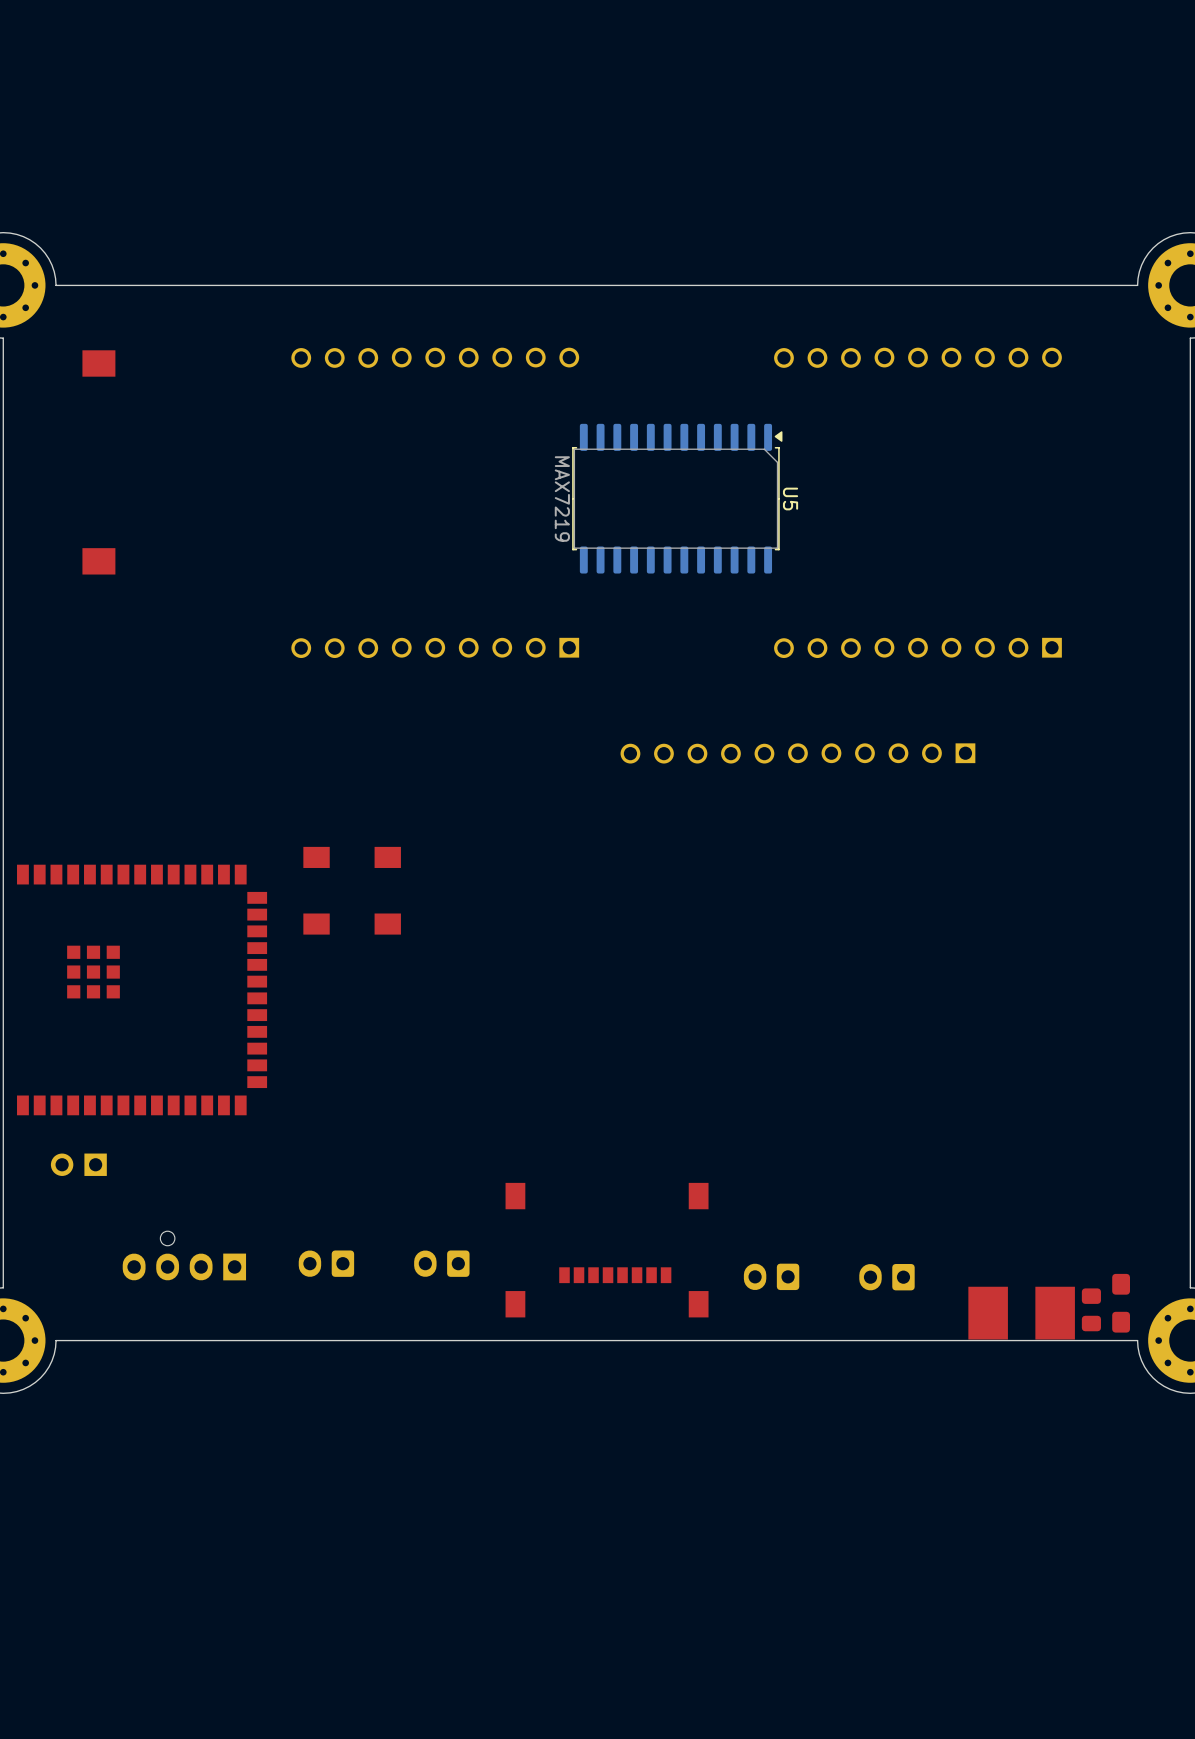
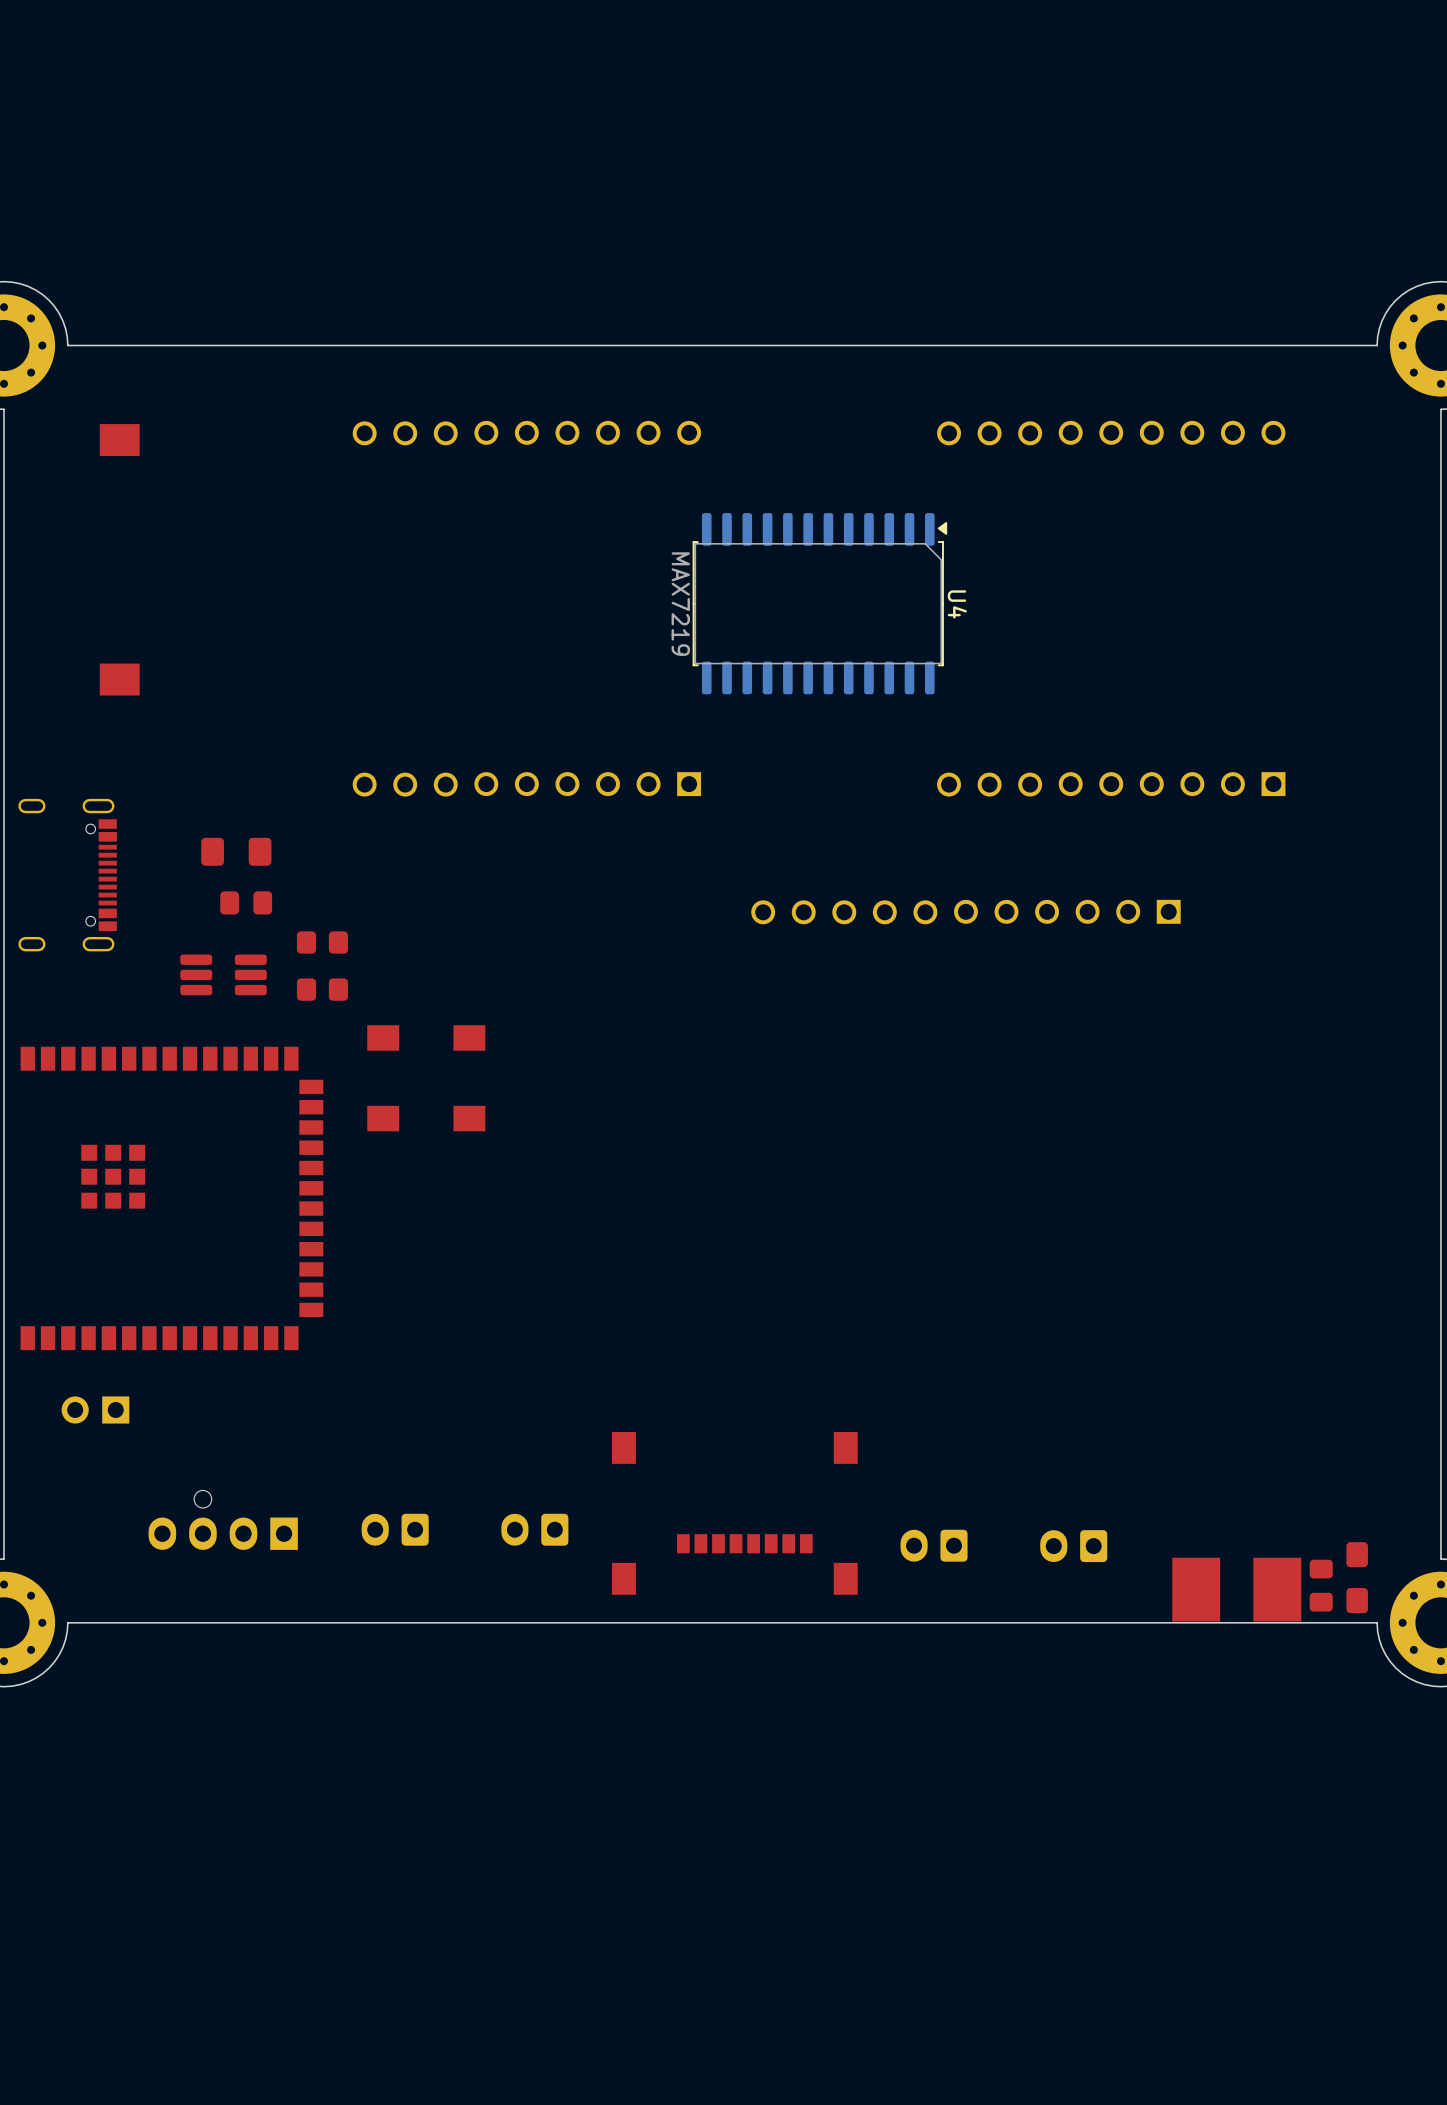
U5 name: U5 (790, 499) -> U4 (957, 604)
part: none -> (236, 851)
part: none -> (67, 875)
part: none -> (246, 902)
part: none -> (322, 942)
part: none -> (223, 974)
part: none -> (322, 989)

